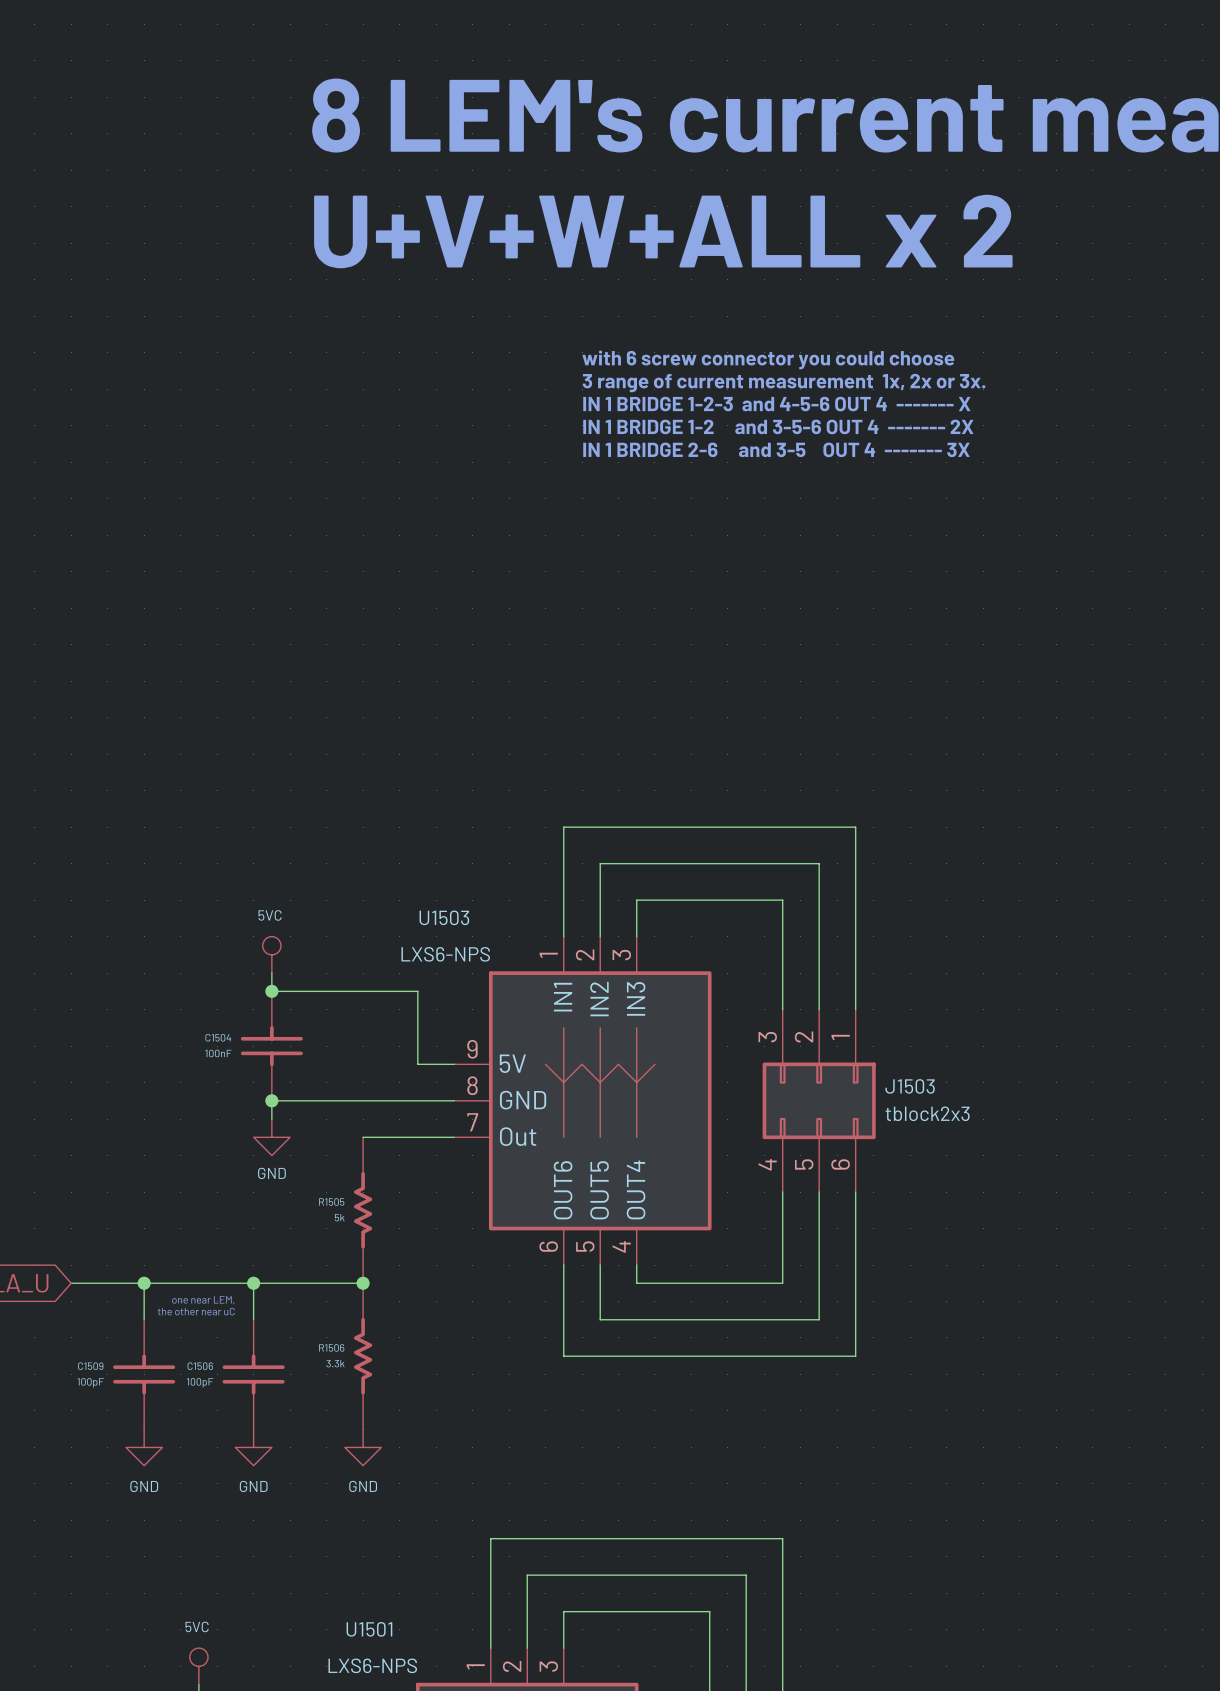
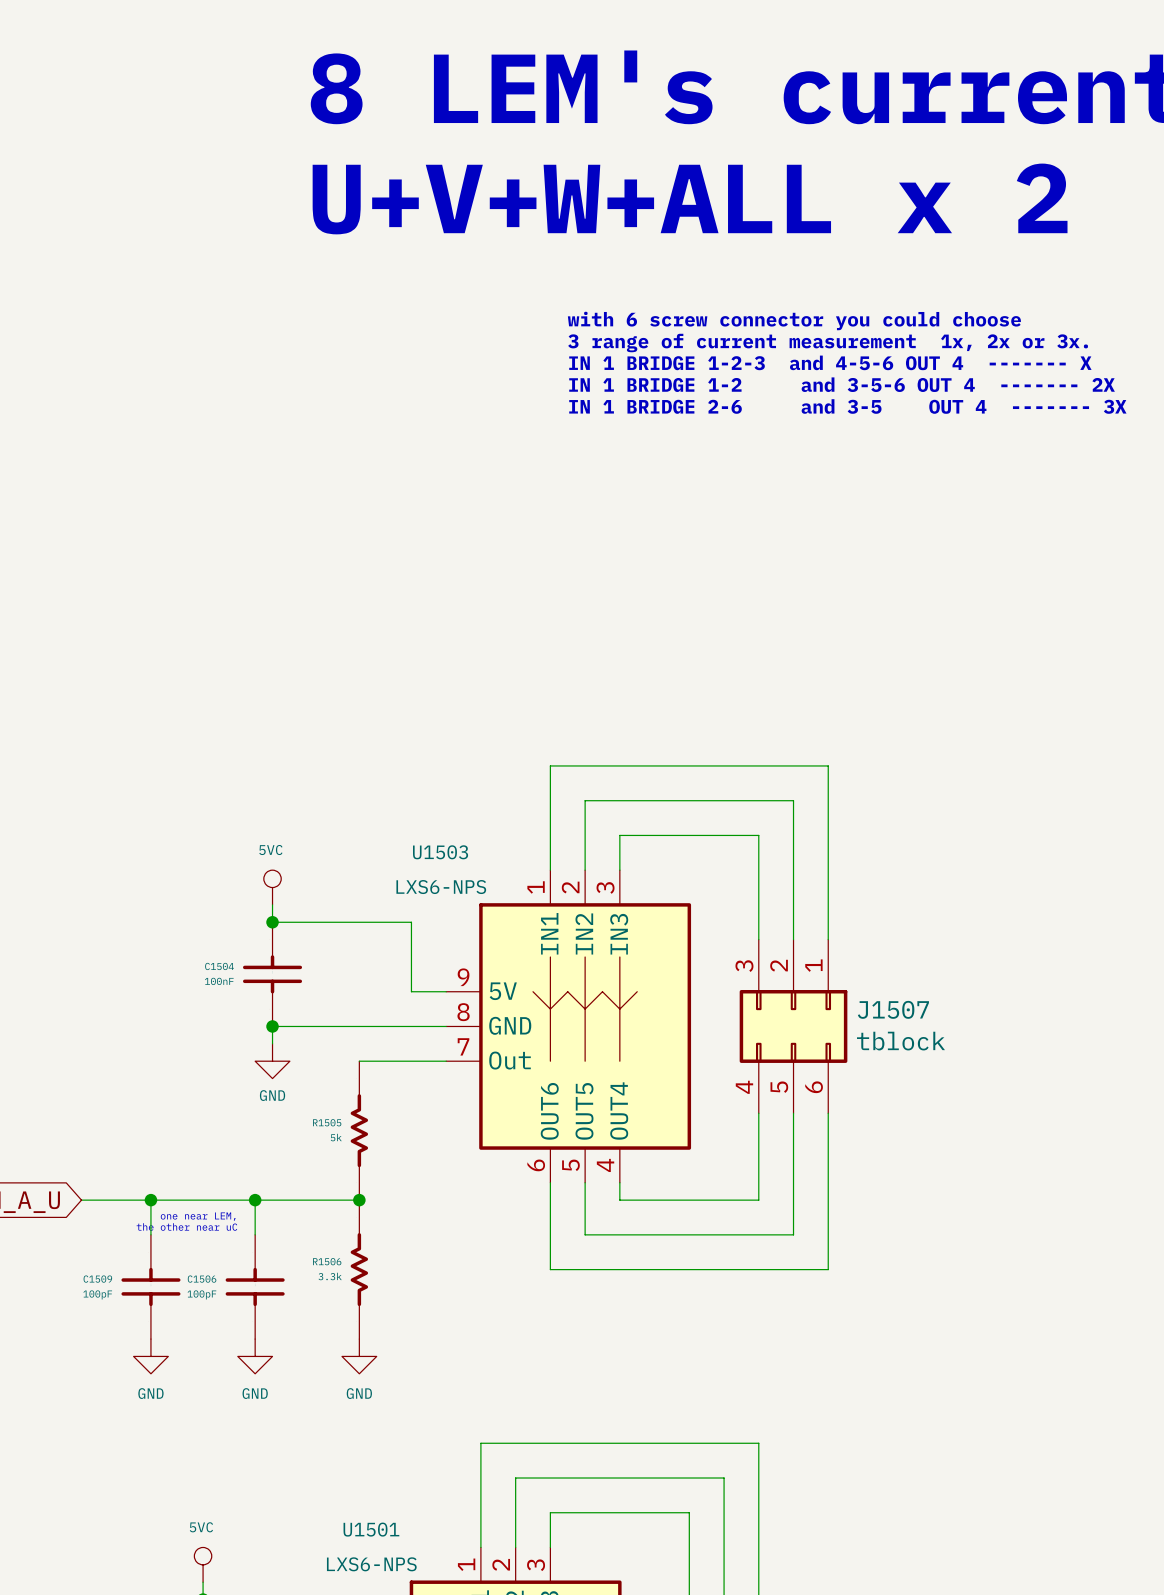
J1503 name: J1503 (910, 1086) -> J1507 (893, 1009)
J1503 value: tblock2x3 (927, 1113) -> tblock (900, 1041)

